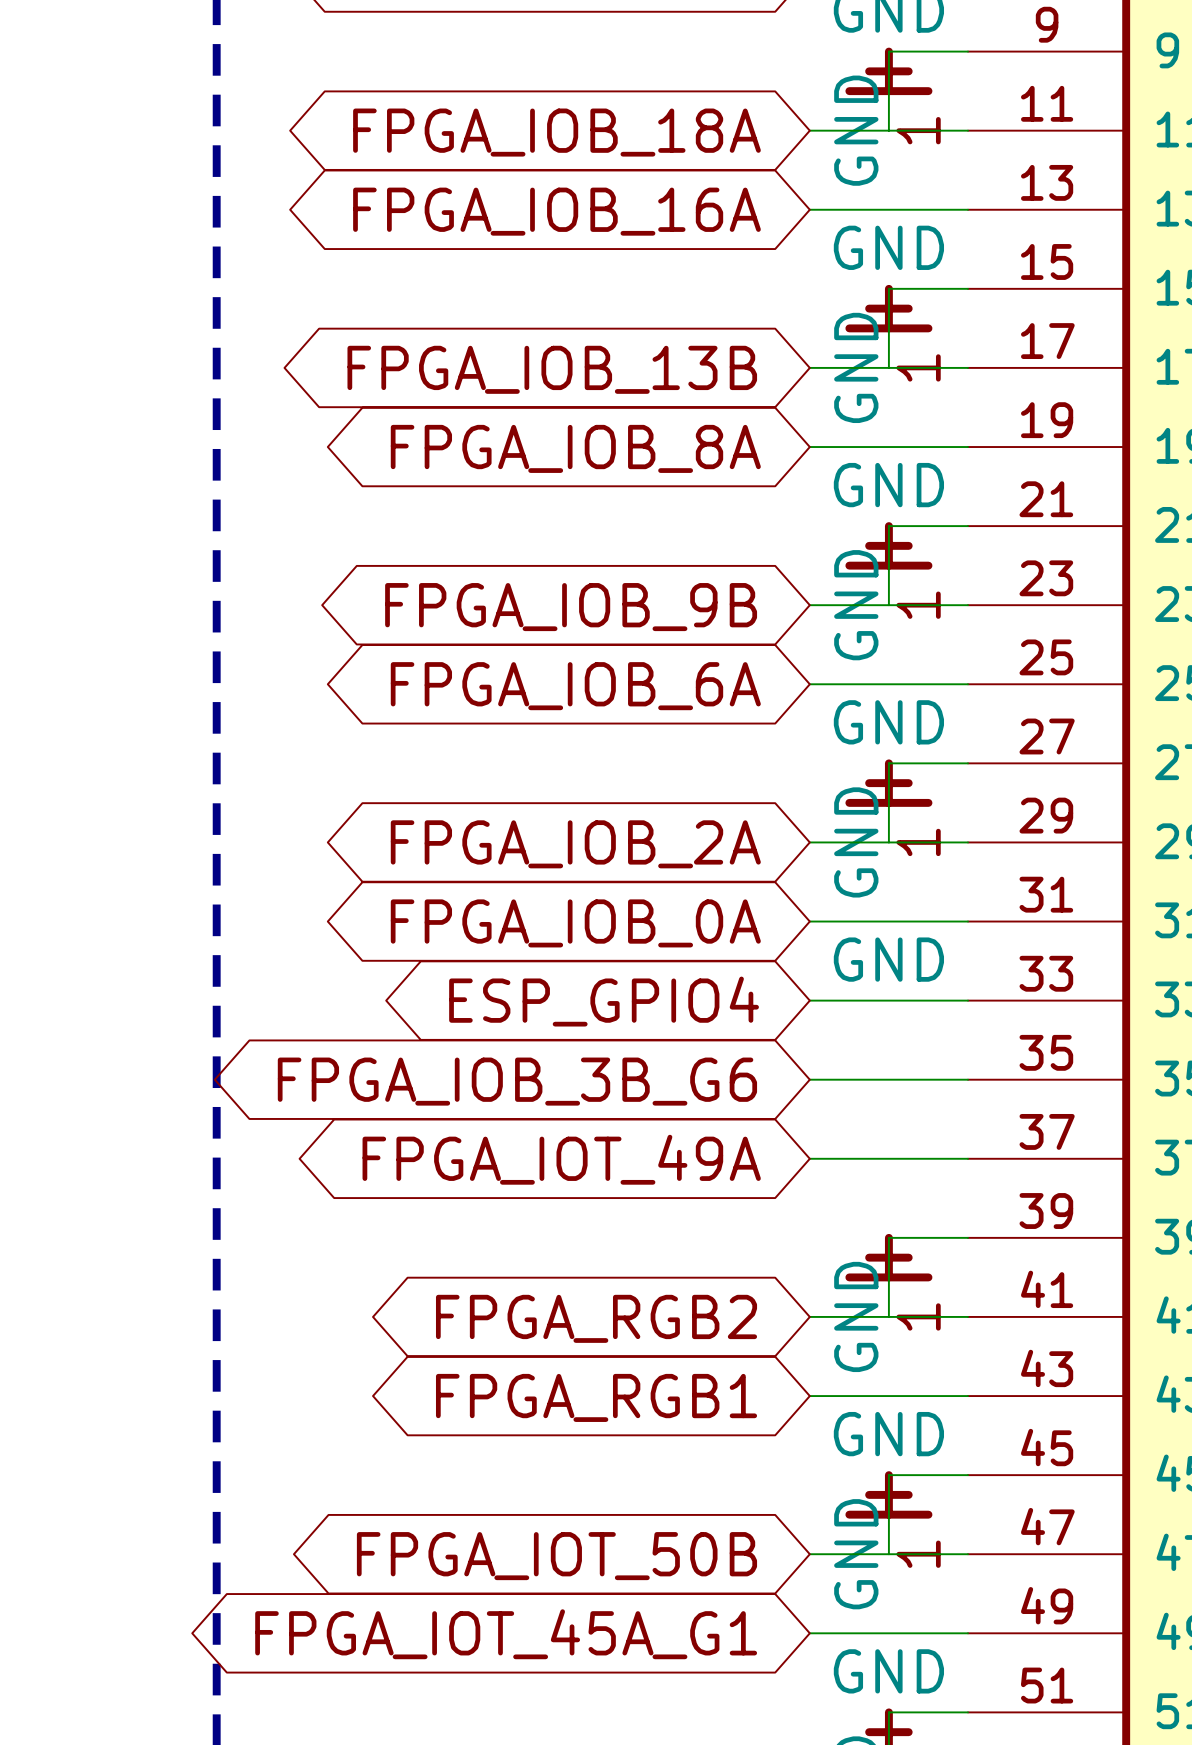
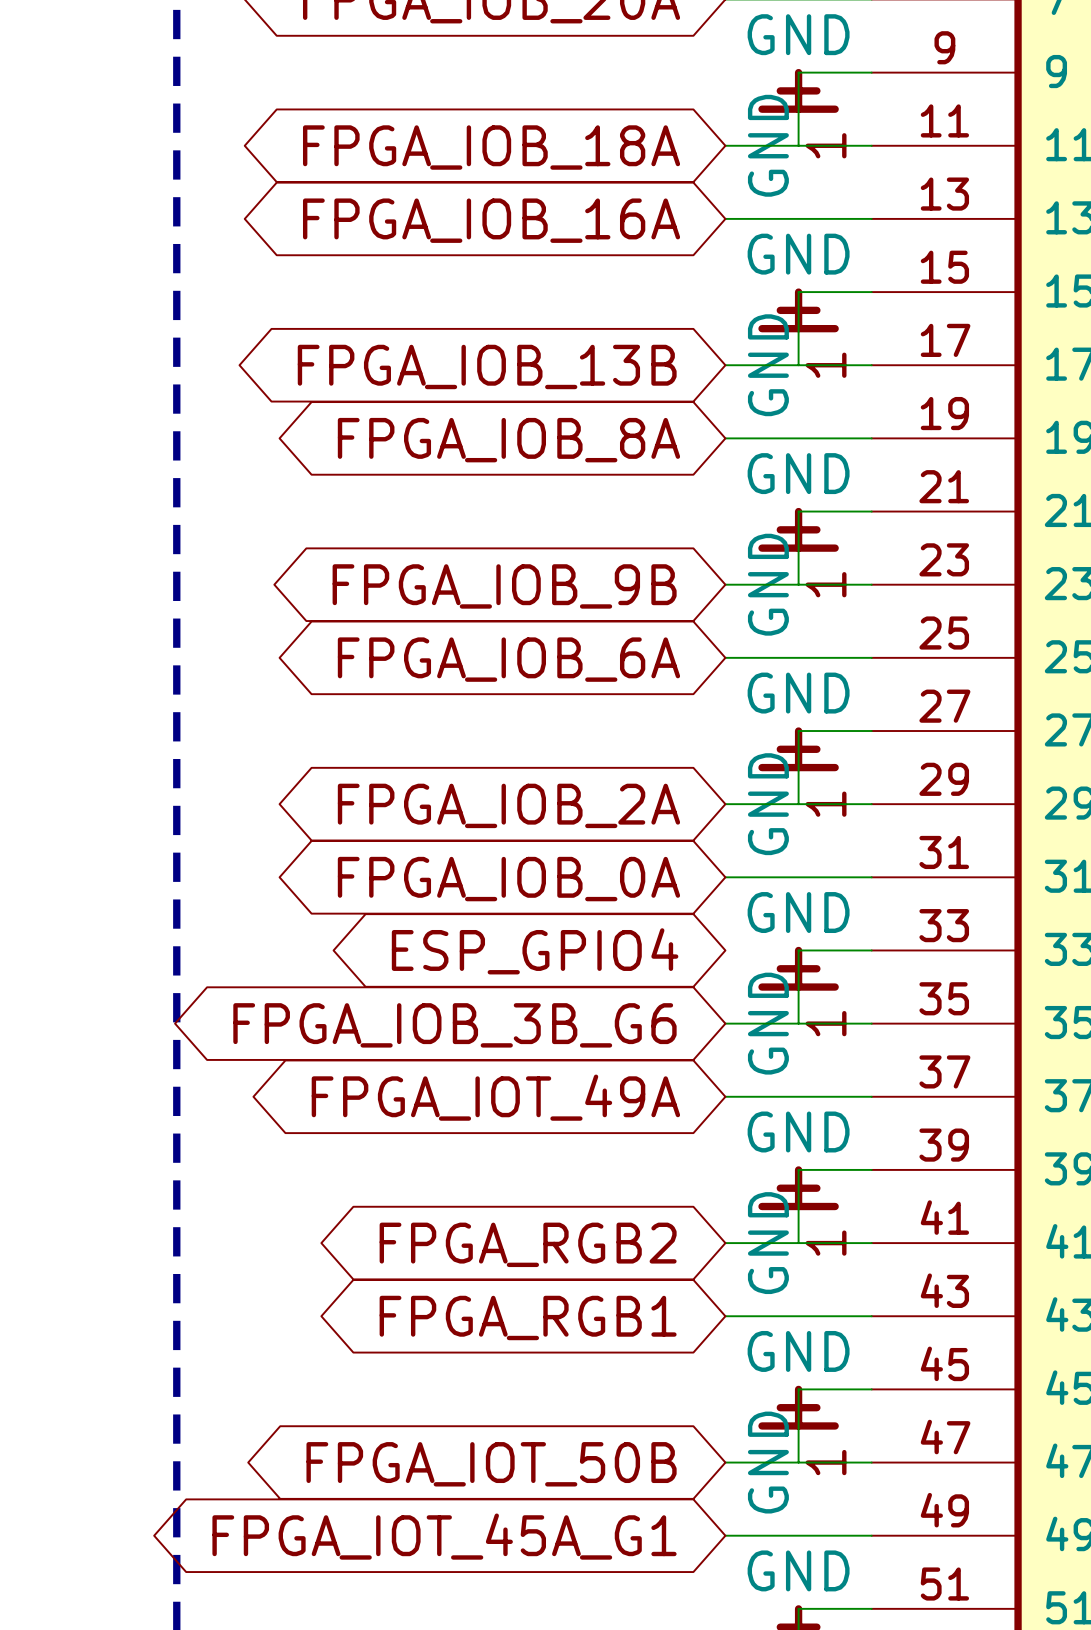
wire: (809, 1000) (888, 1000) -> (798, 1023) (798, 950)
power symbol: none -> GND (798, 968)

